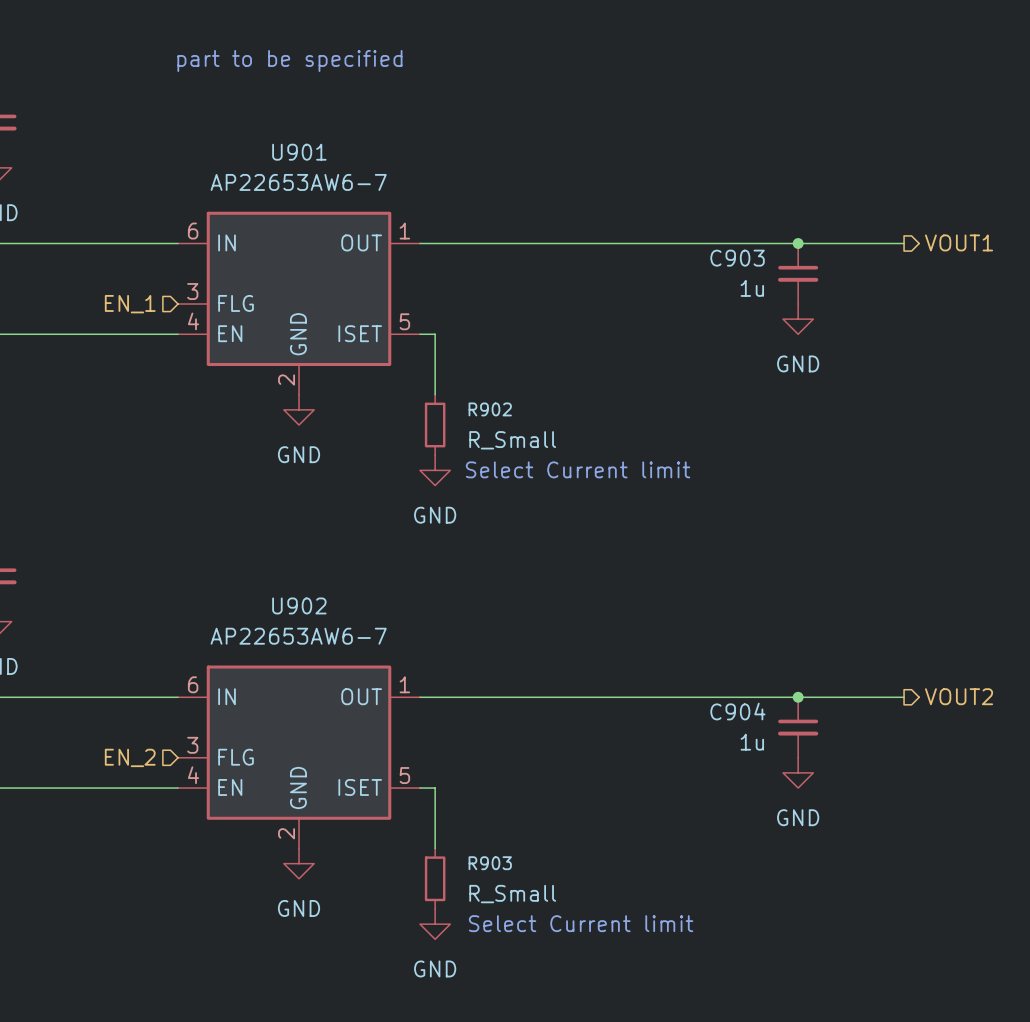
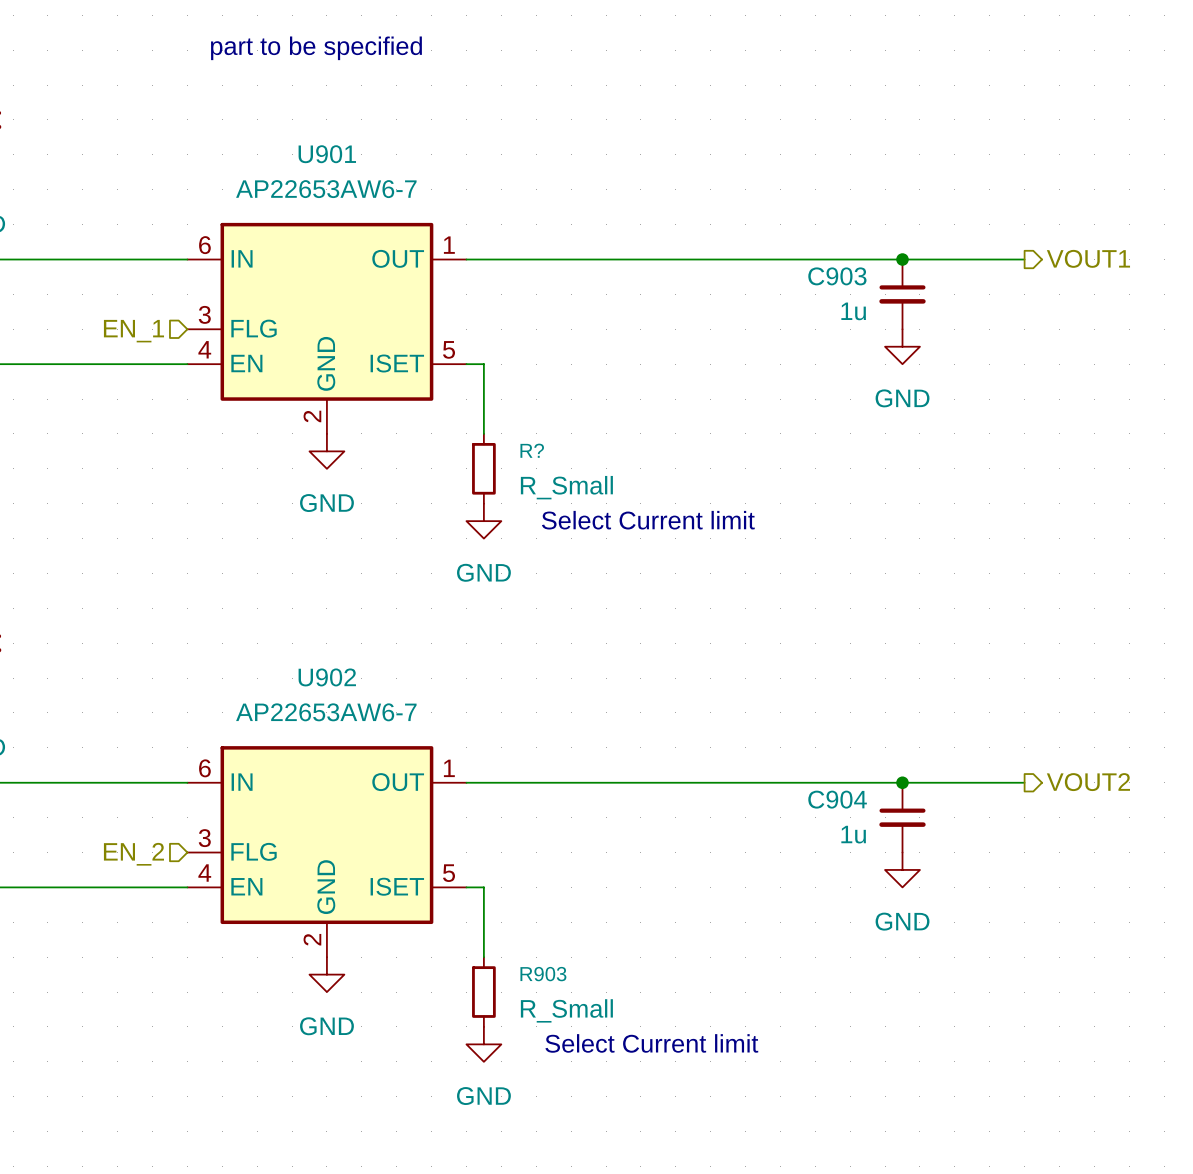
R902 name: R902 (490, 409) -> R? (532, 450)

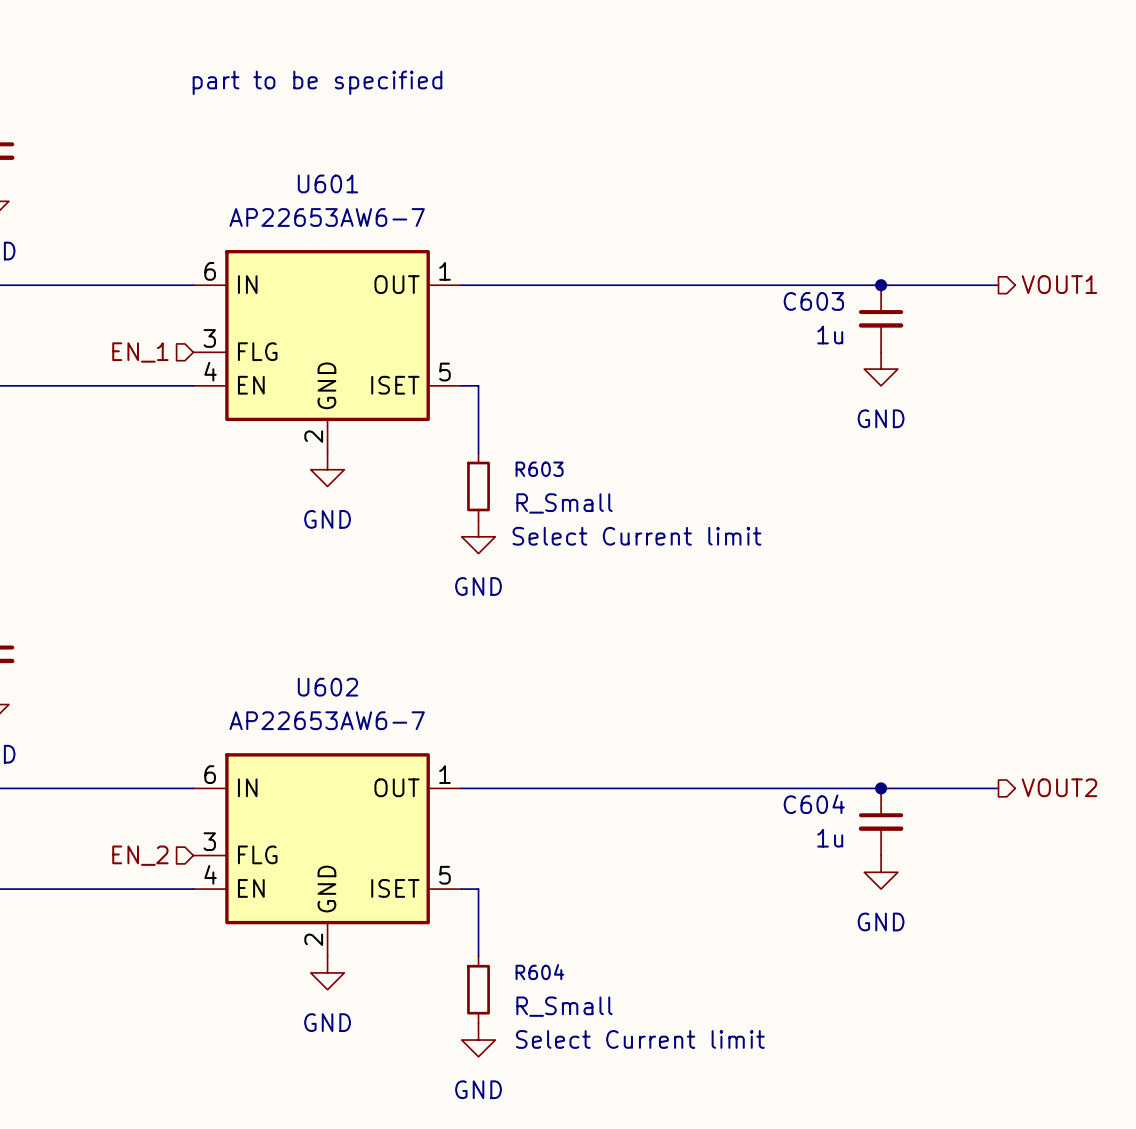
U901 name: U901 (327, 154) -> U601 (327, 183)
C903 name: C903 (837, 276) -> C603 (813, 301)
R? name: R? (532, 450) -> R603 (539, 469)
U902 name: U902 (327, 677) -> U602 (327, 687)
C904 name: C904 (837, 799) -> C604 (814, 804)
R903 name: R903 (543, 974) -> R604 (539, 972)

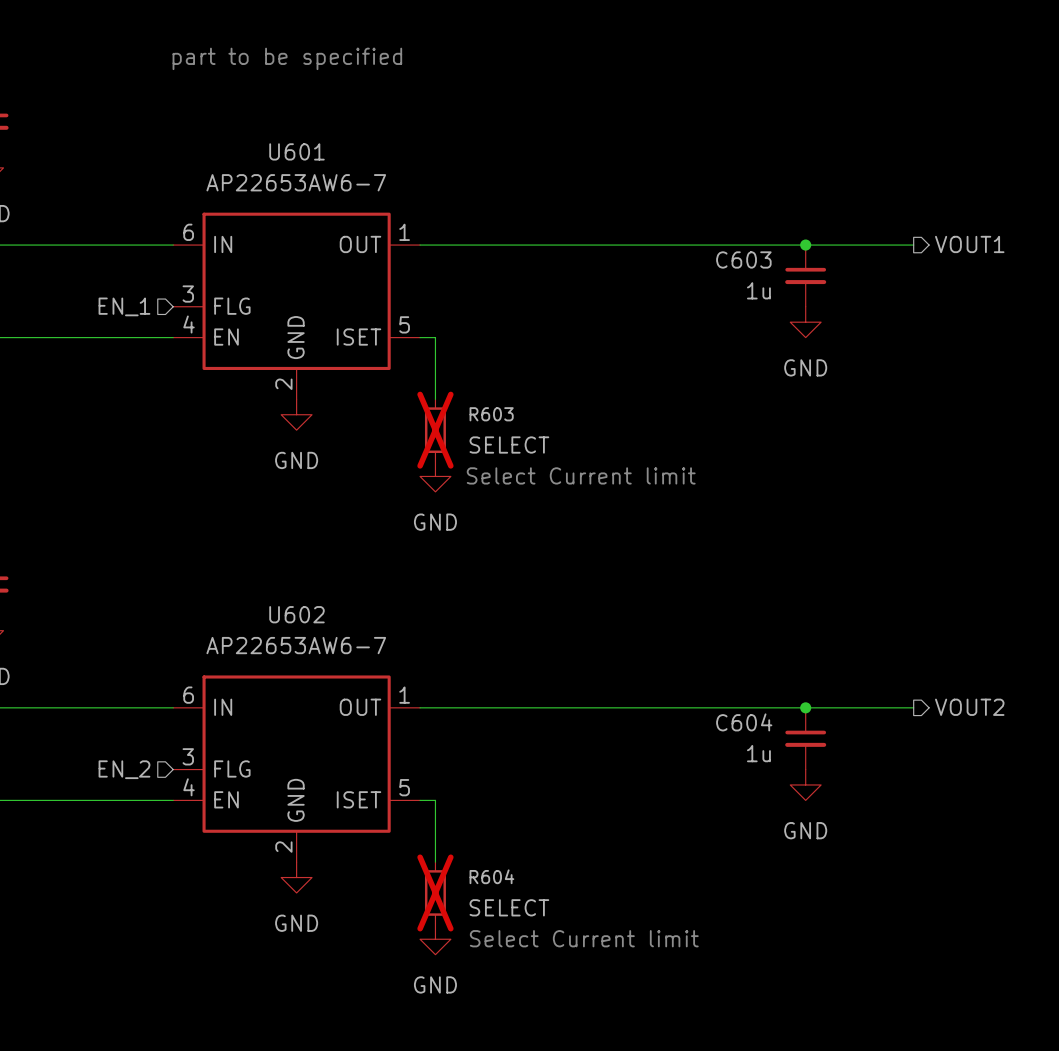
R603 do-not-place cross: none -> (435, 430)
R603 value: R_Small (564, 503) -> SELECT (509, 445)
R604 do-not-place cross: none -> (435, 892)
R604 value: R_Small (564, 1006) -> SELECT (509, 907)

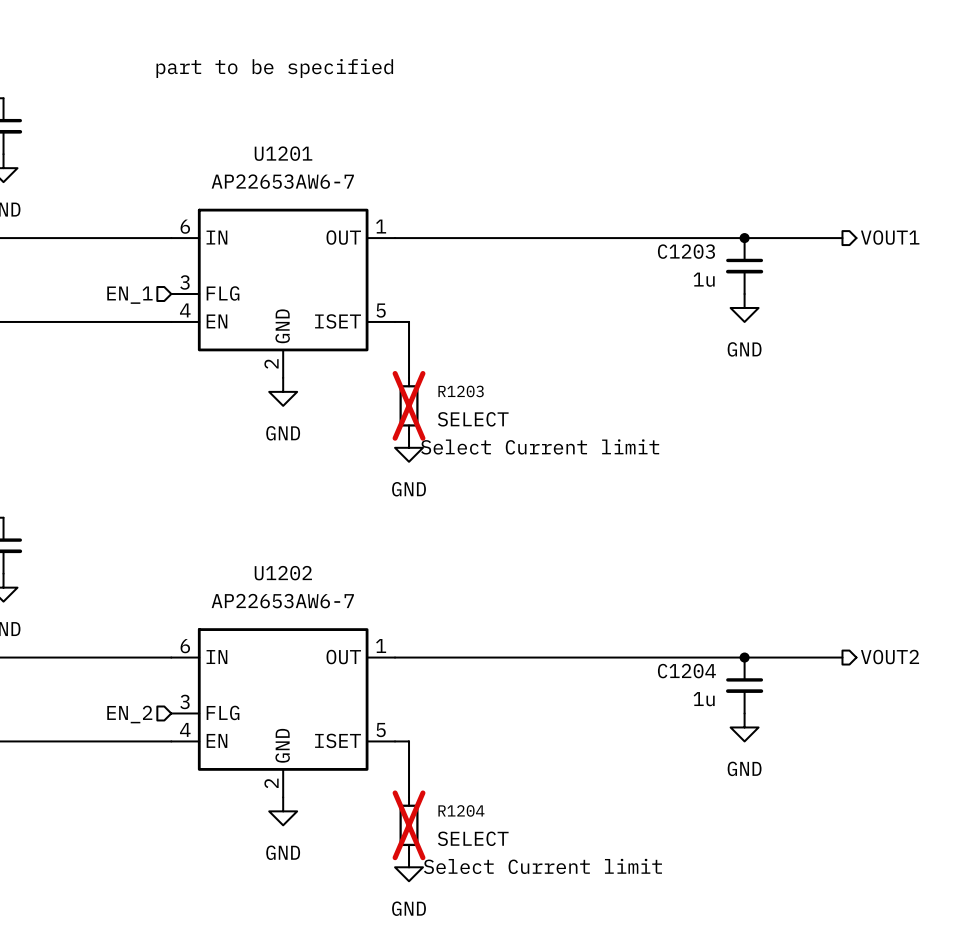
U601 name: U601 (296, 151) -> U1201 (283, 153)
C603 name: C603 (743, 259) -> C1203 (686, 251)
R603 name: R603 (491, 414) -> R1203 (461, 391)
U602 name: U602 (296, 614) -> U1202 (283, 573)
C604 name: C604 (744, 722) -> C1204 (686, 671)
R604 name: R604 (491, 876) -> R1204 (461, 810)

